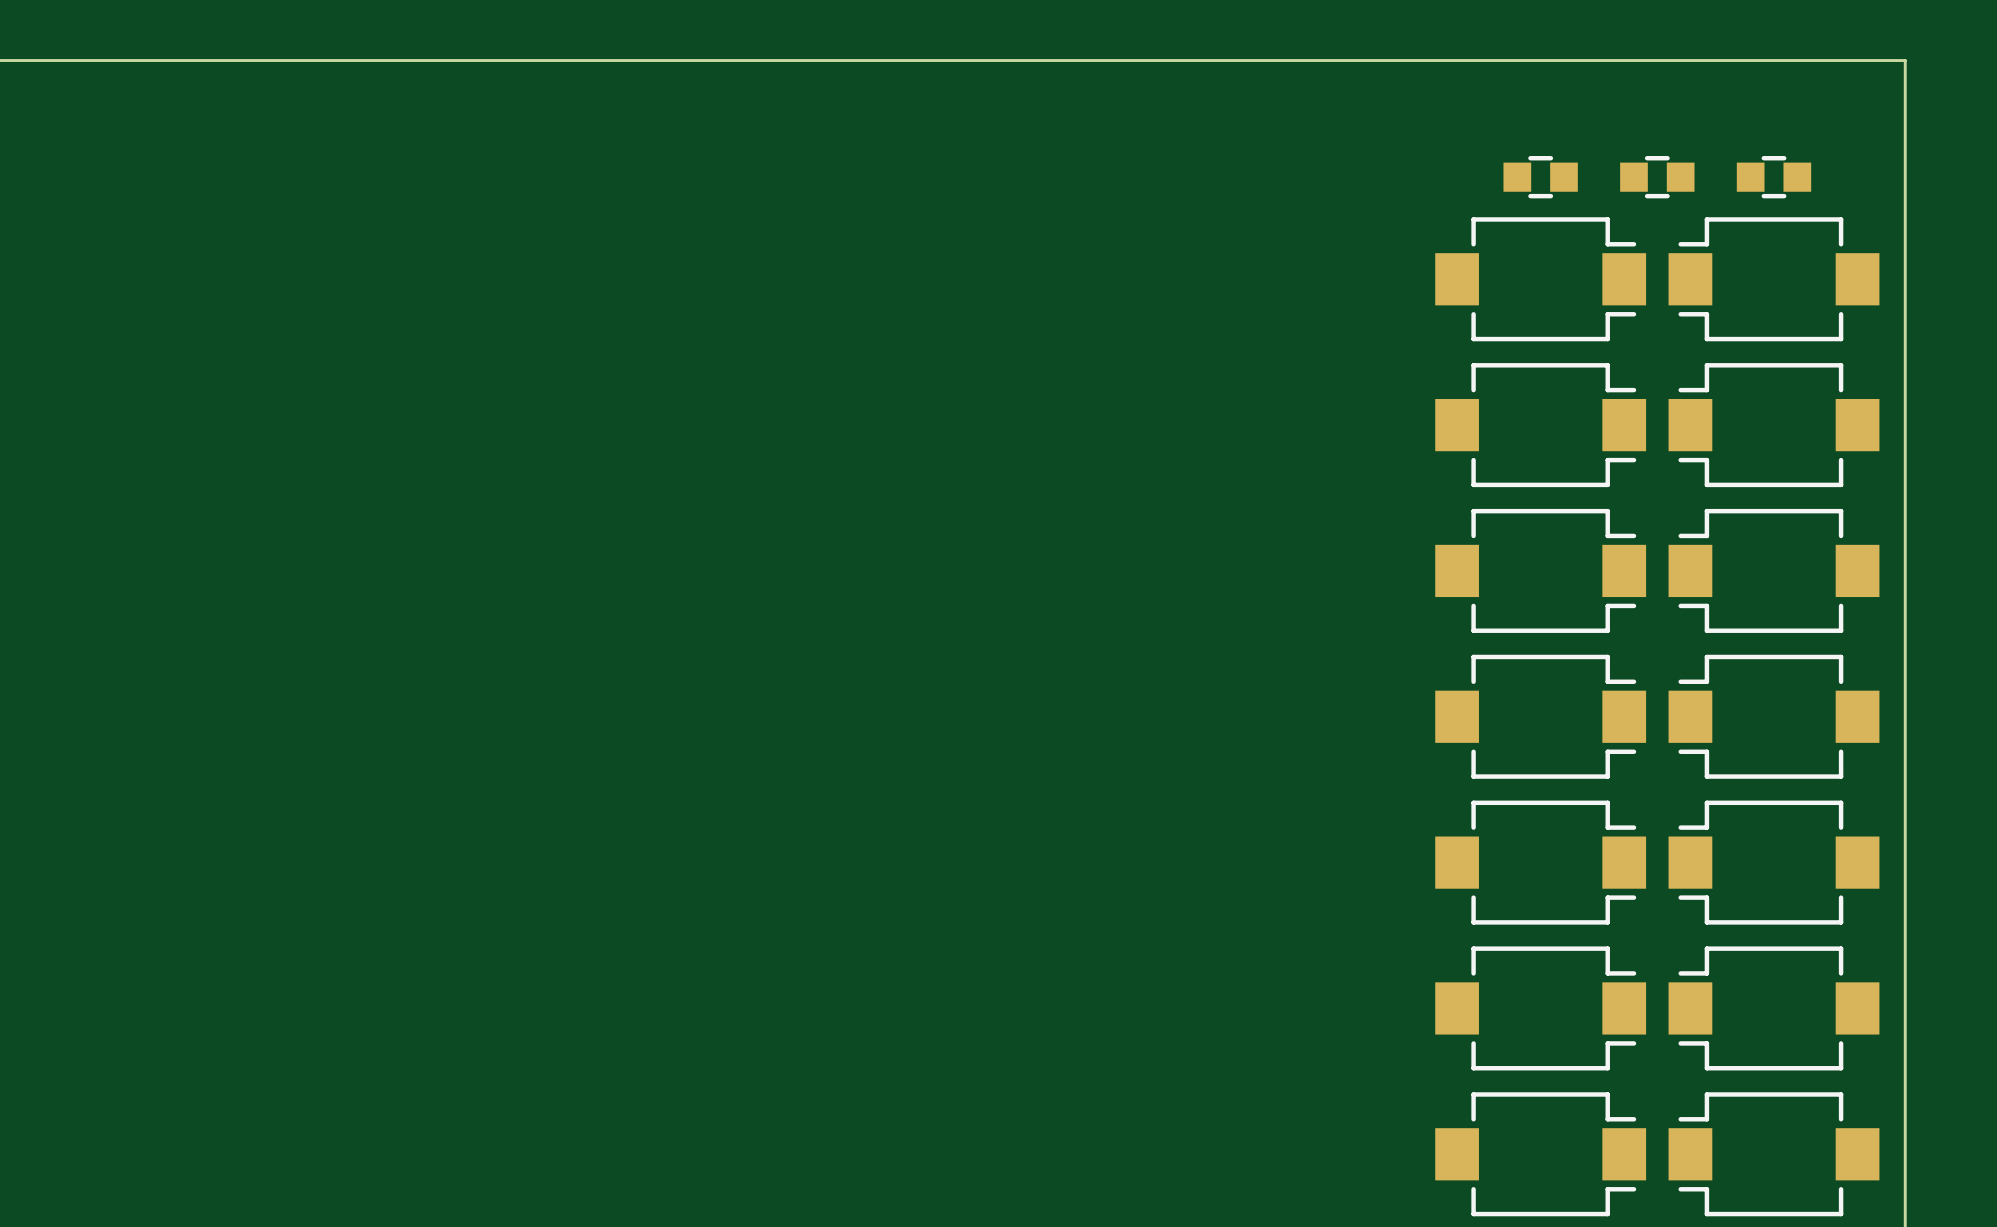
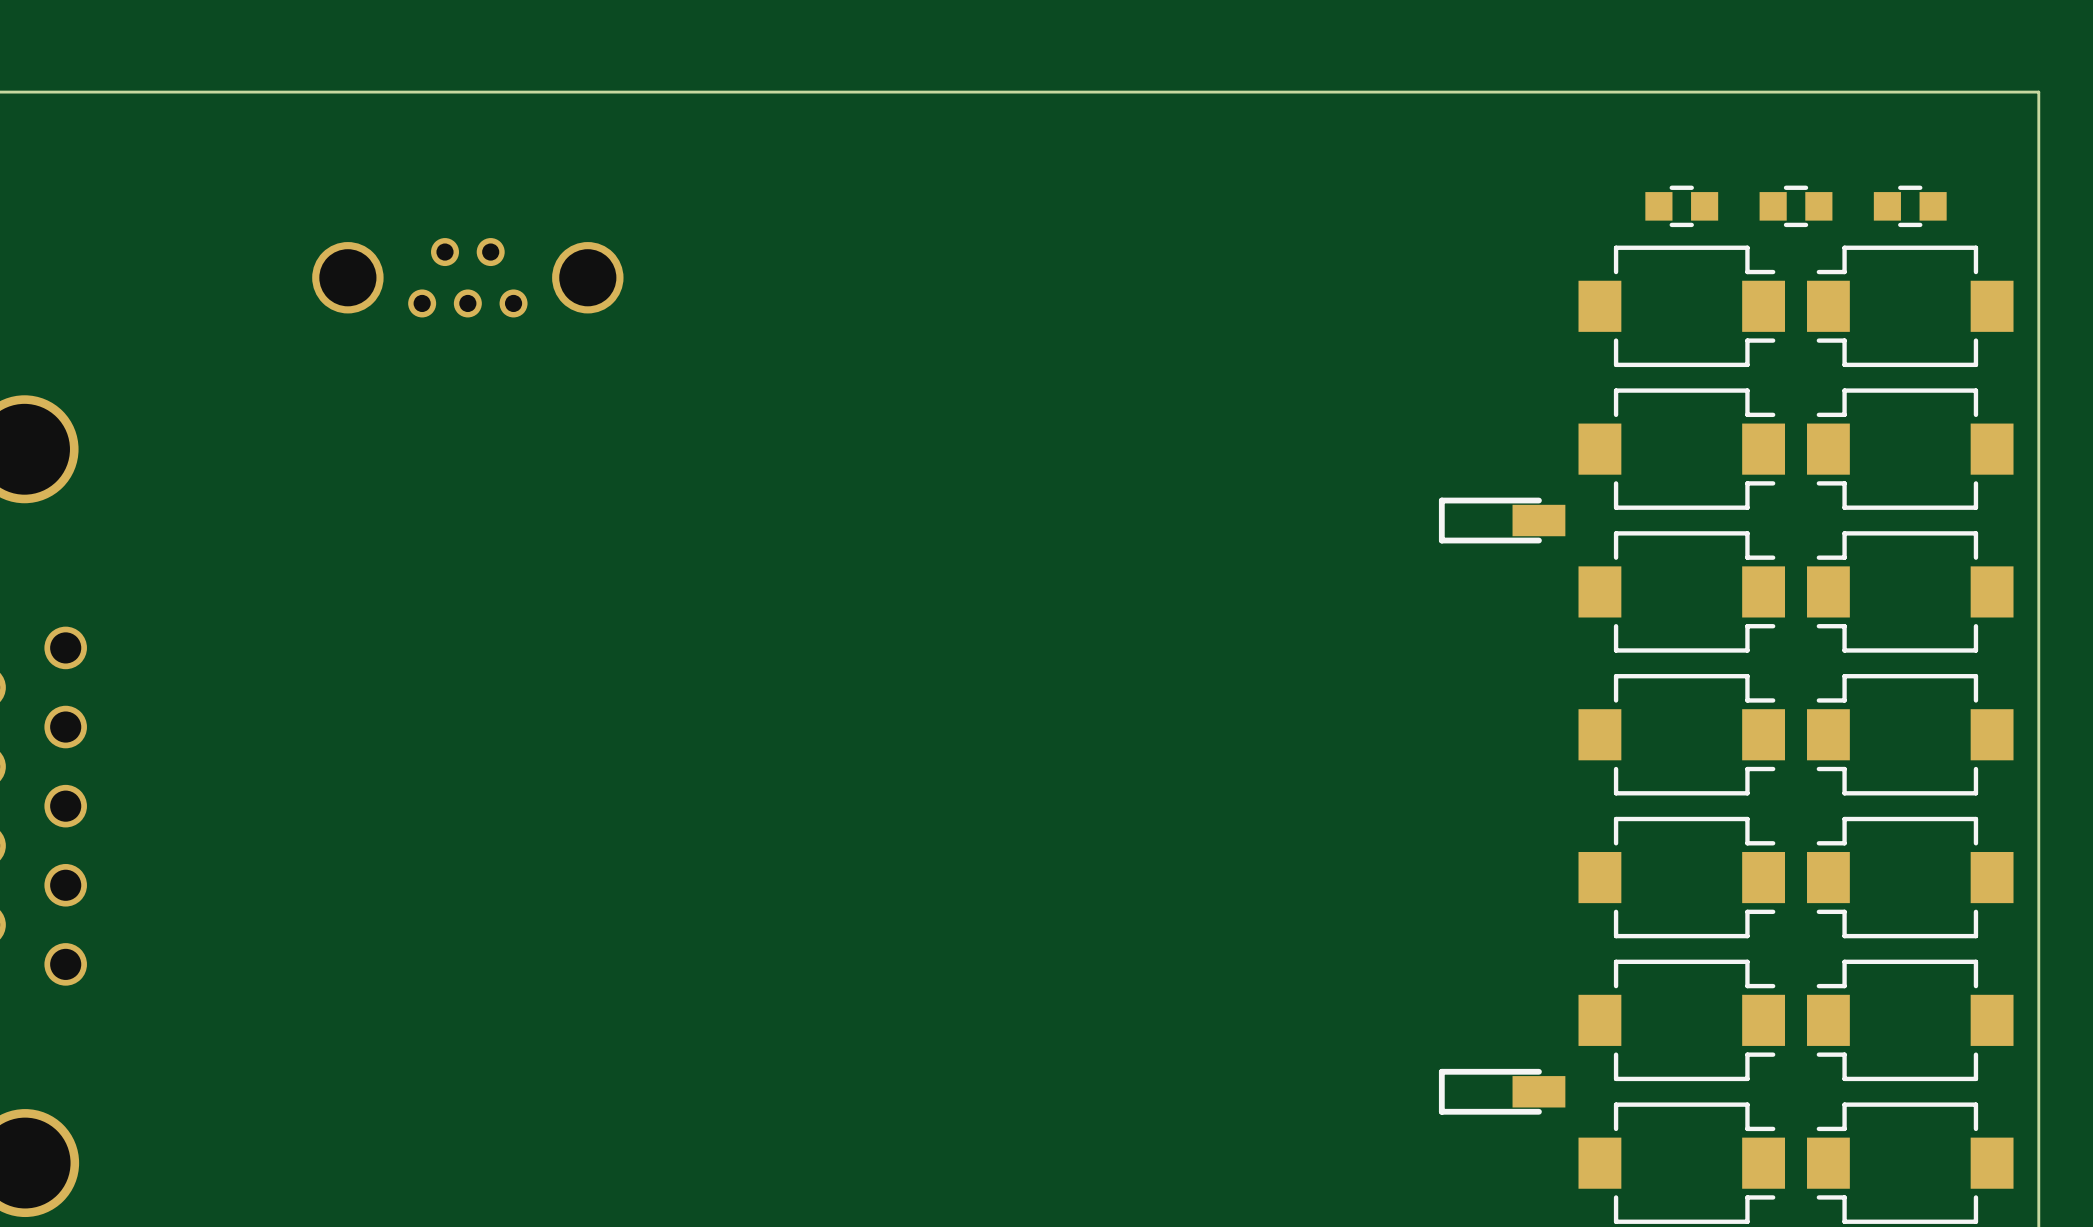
part: none -> (467, 277)
part: none -> (1502, 520)
part: none -> (1502, 1091)

